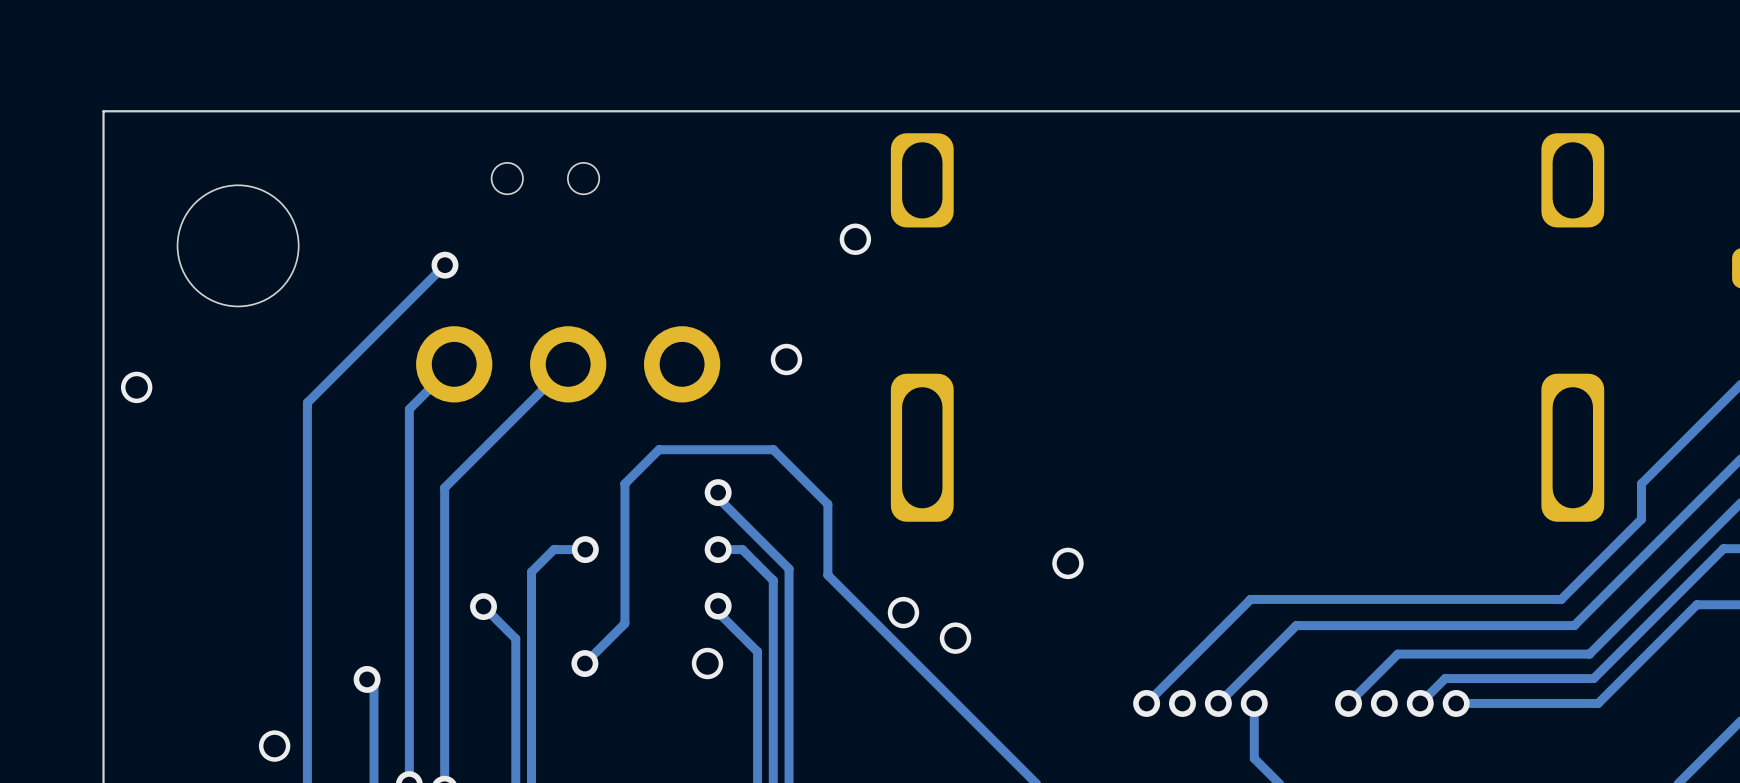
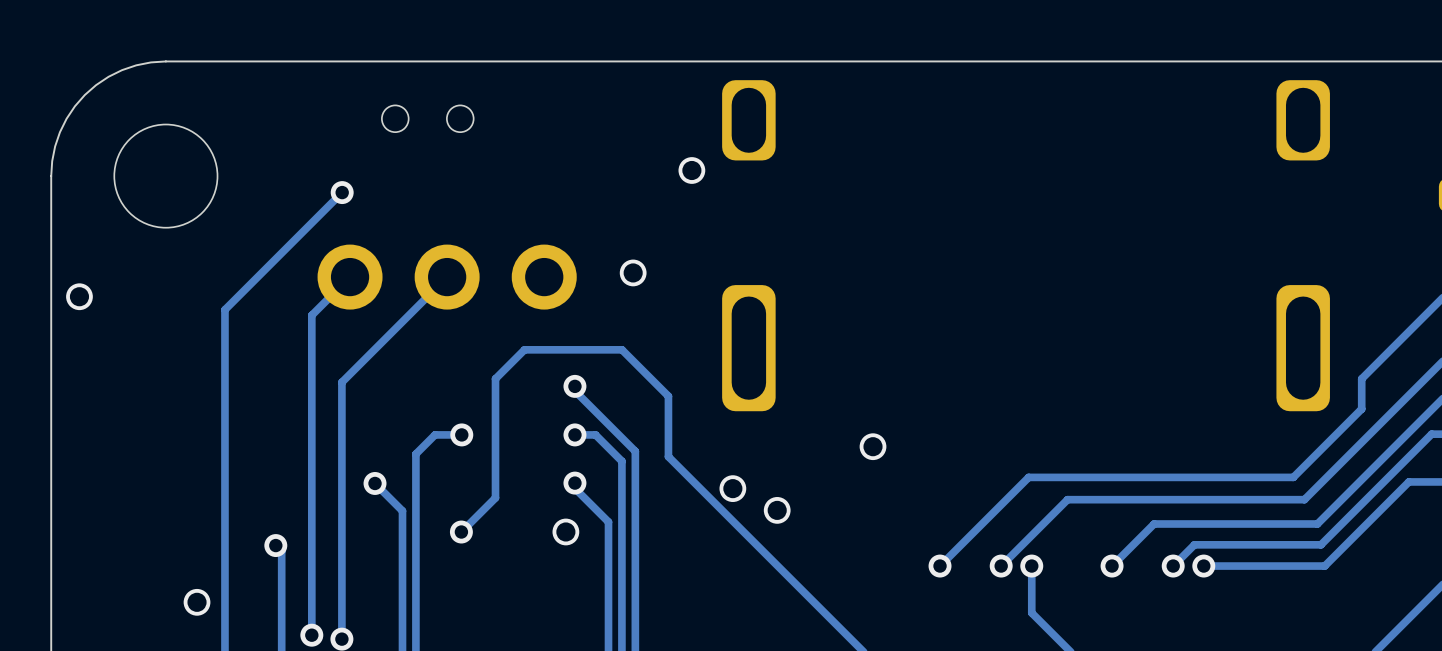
board edge: (238, 111) (103, 111) (103, 245) -> (165, 61) (150, 62) (122, 70) (96, 85) (84, 95) (74, 106) (59, 132) (55, 146) (51, 176)
via: (1182, 703) -> none
via: (1384, 703) -> none

